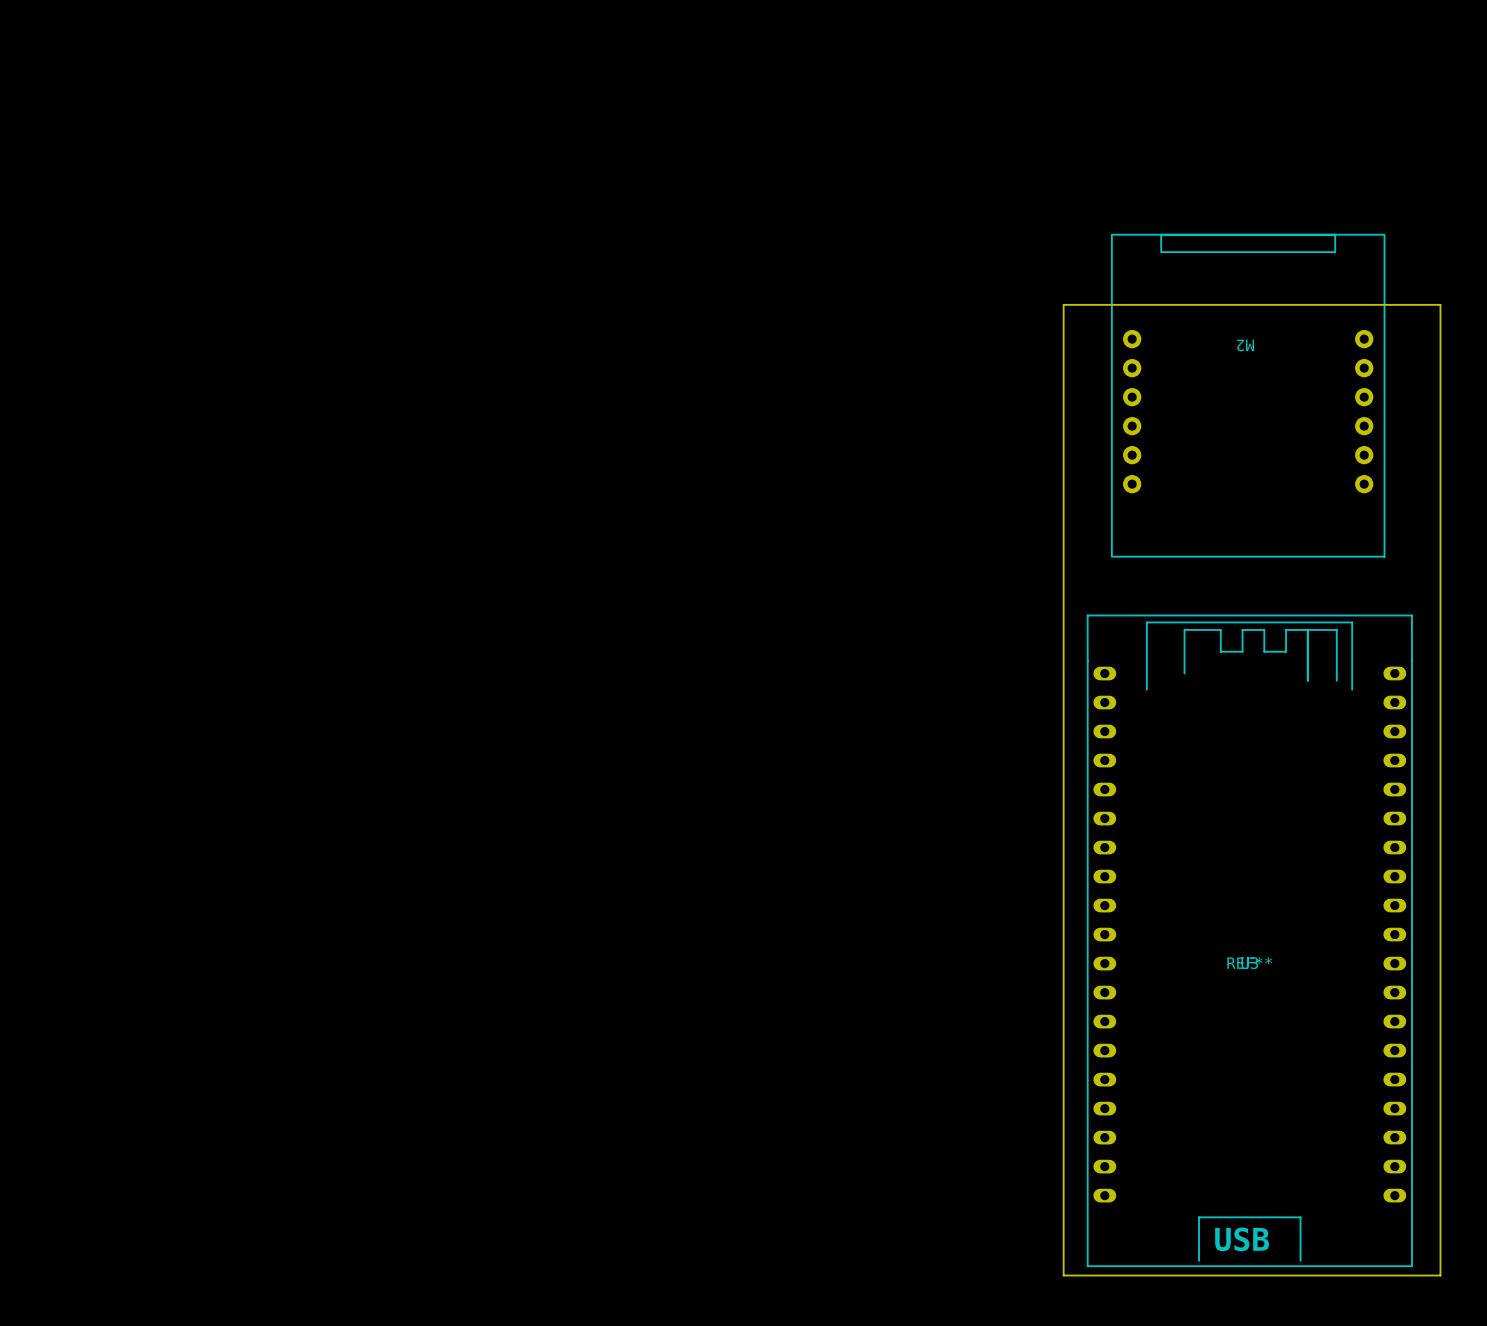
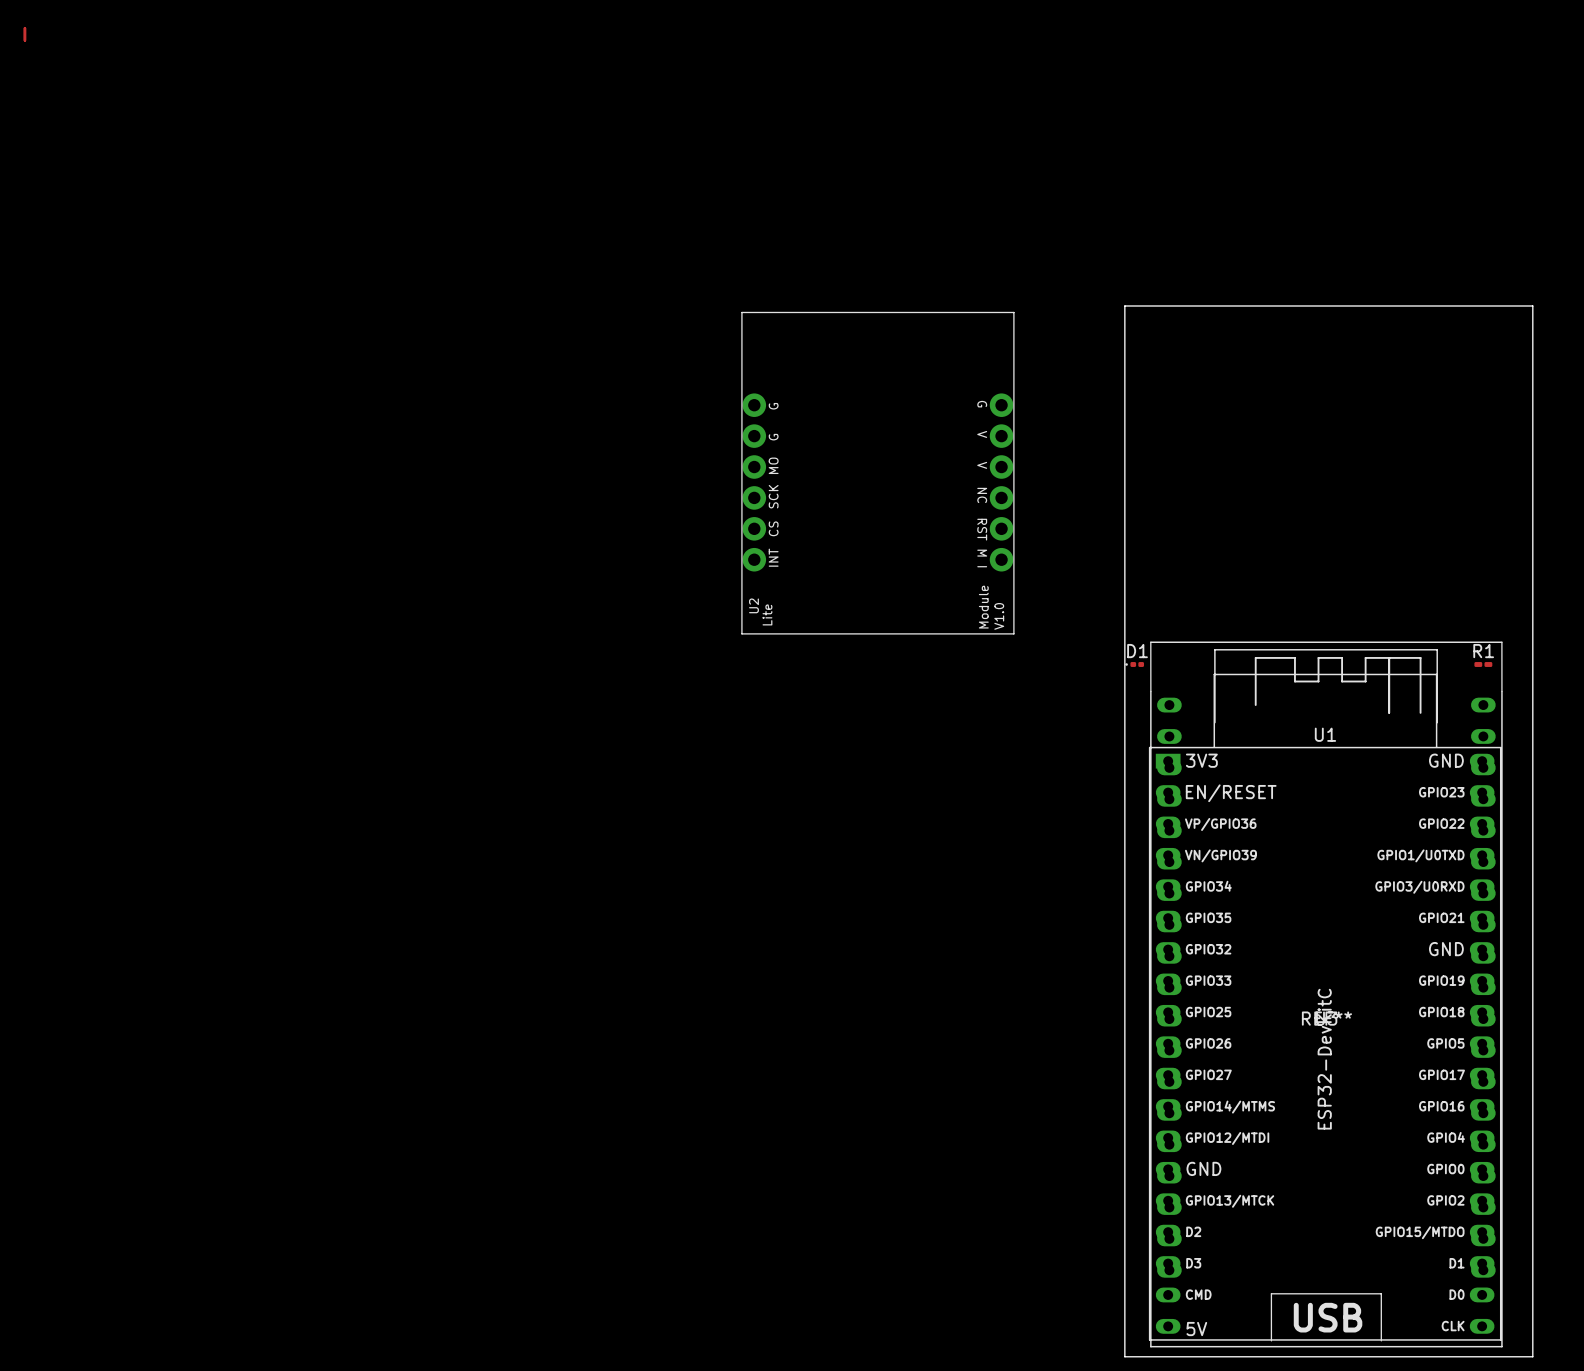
U2: none -> (519, 330)
M2: (1248, 395) -> none
D1: none -> (1134, 664)
R1: none -> (1483, 664)
U1: none -> ESP32-DevKitC (1325, 1007)

